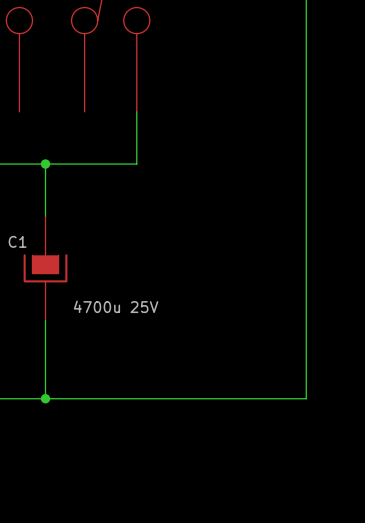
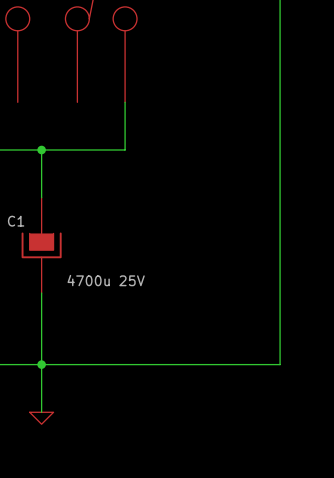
wire: none -> (41, 364) (41, 412)
power symbol: none -> (41, 418)

